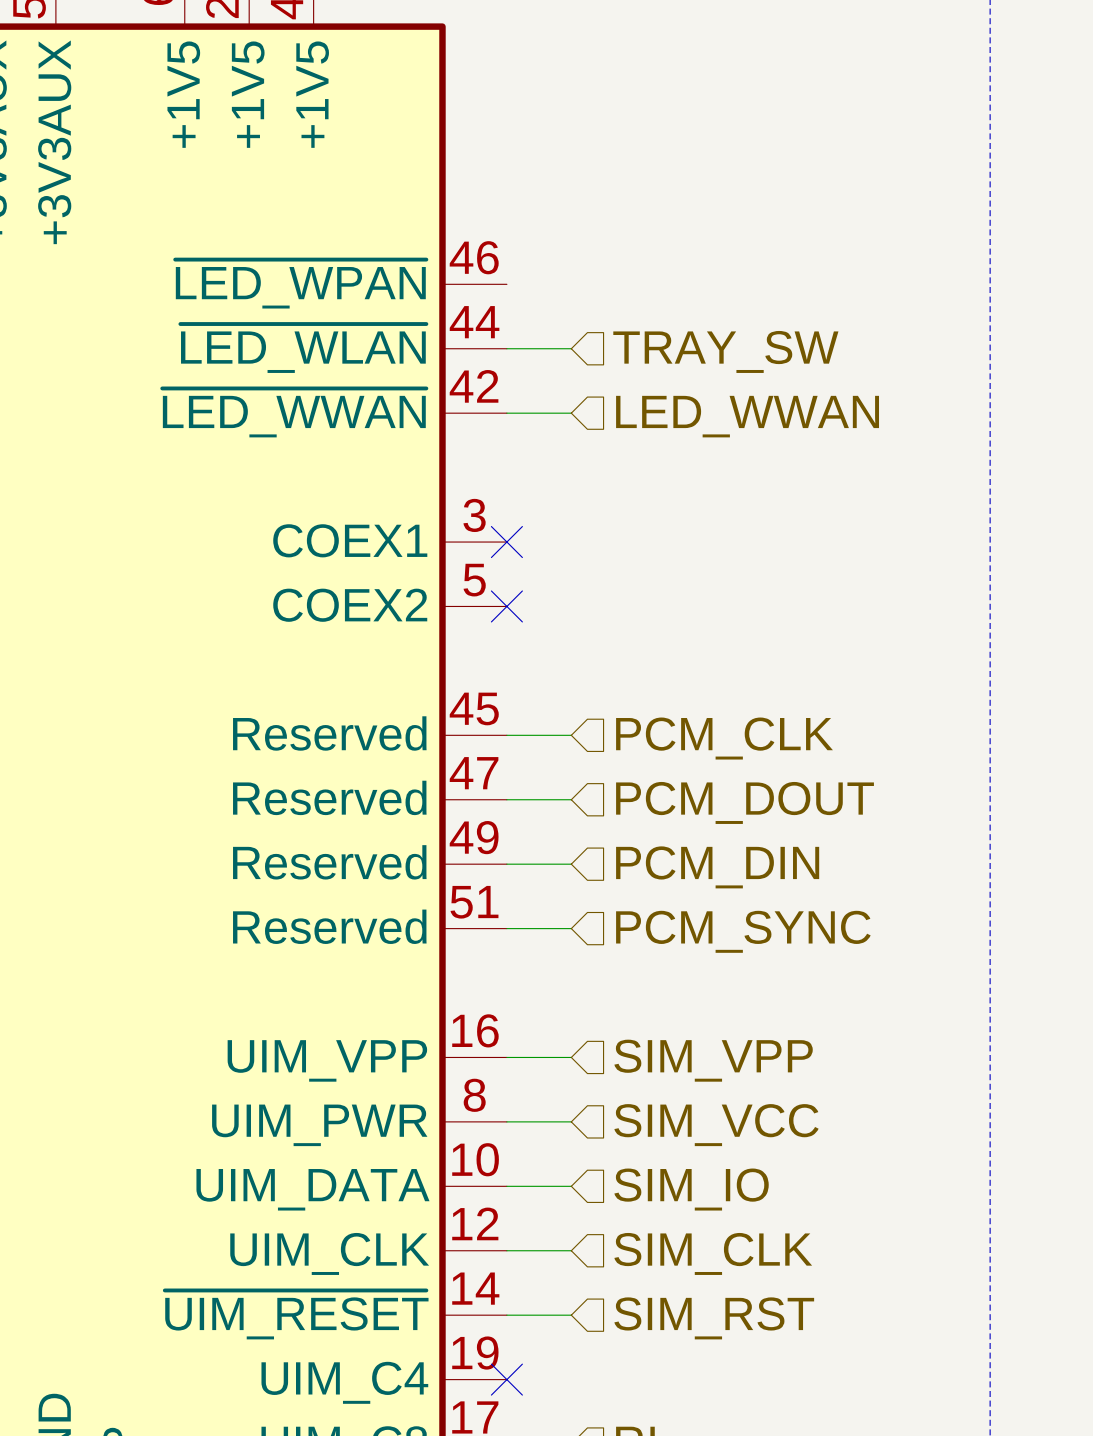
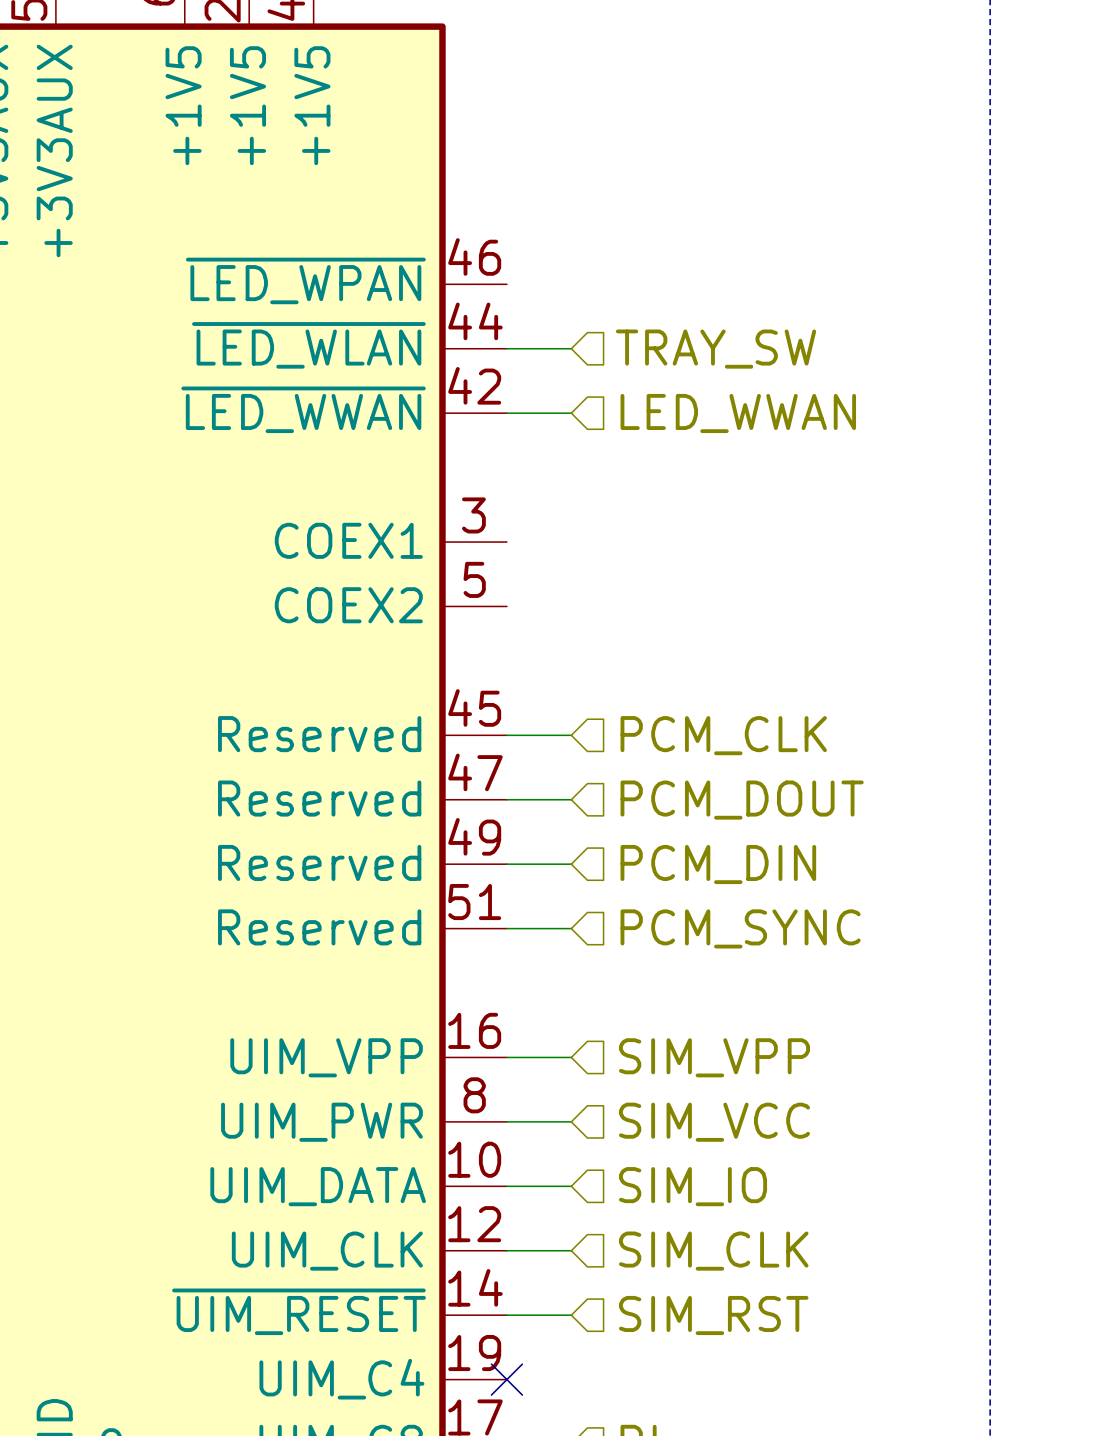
no-connect mark: (506, 542) -> none
no-connect mark: (506, 606) -> none

